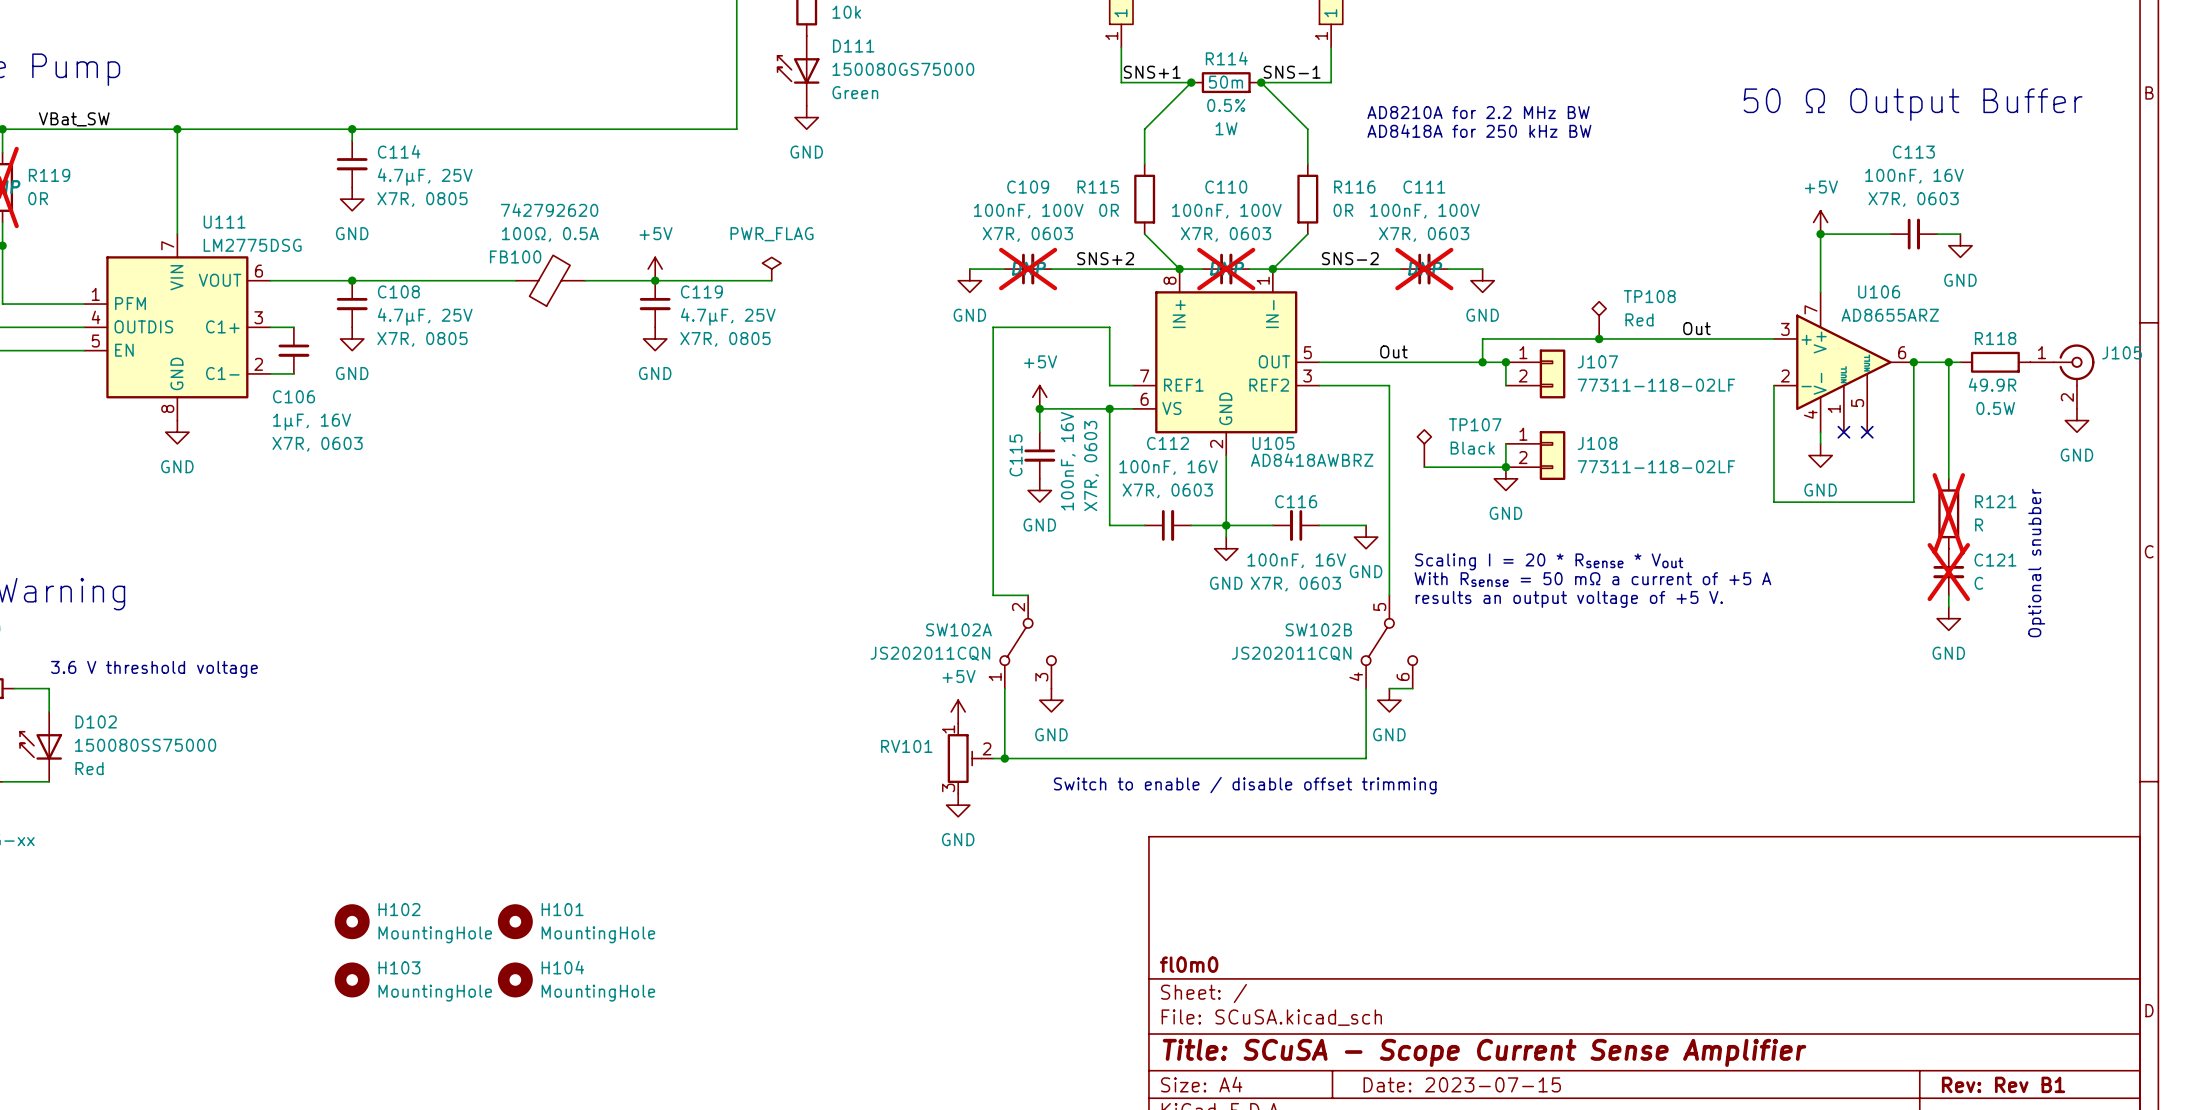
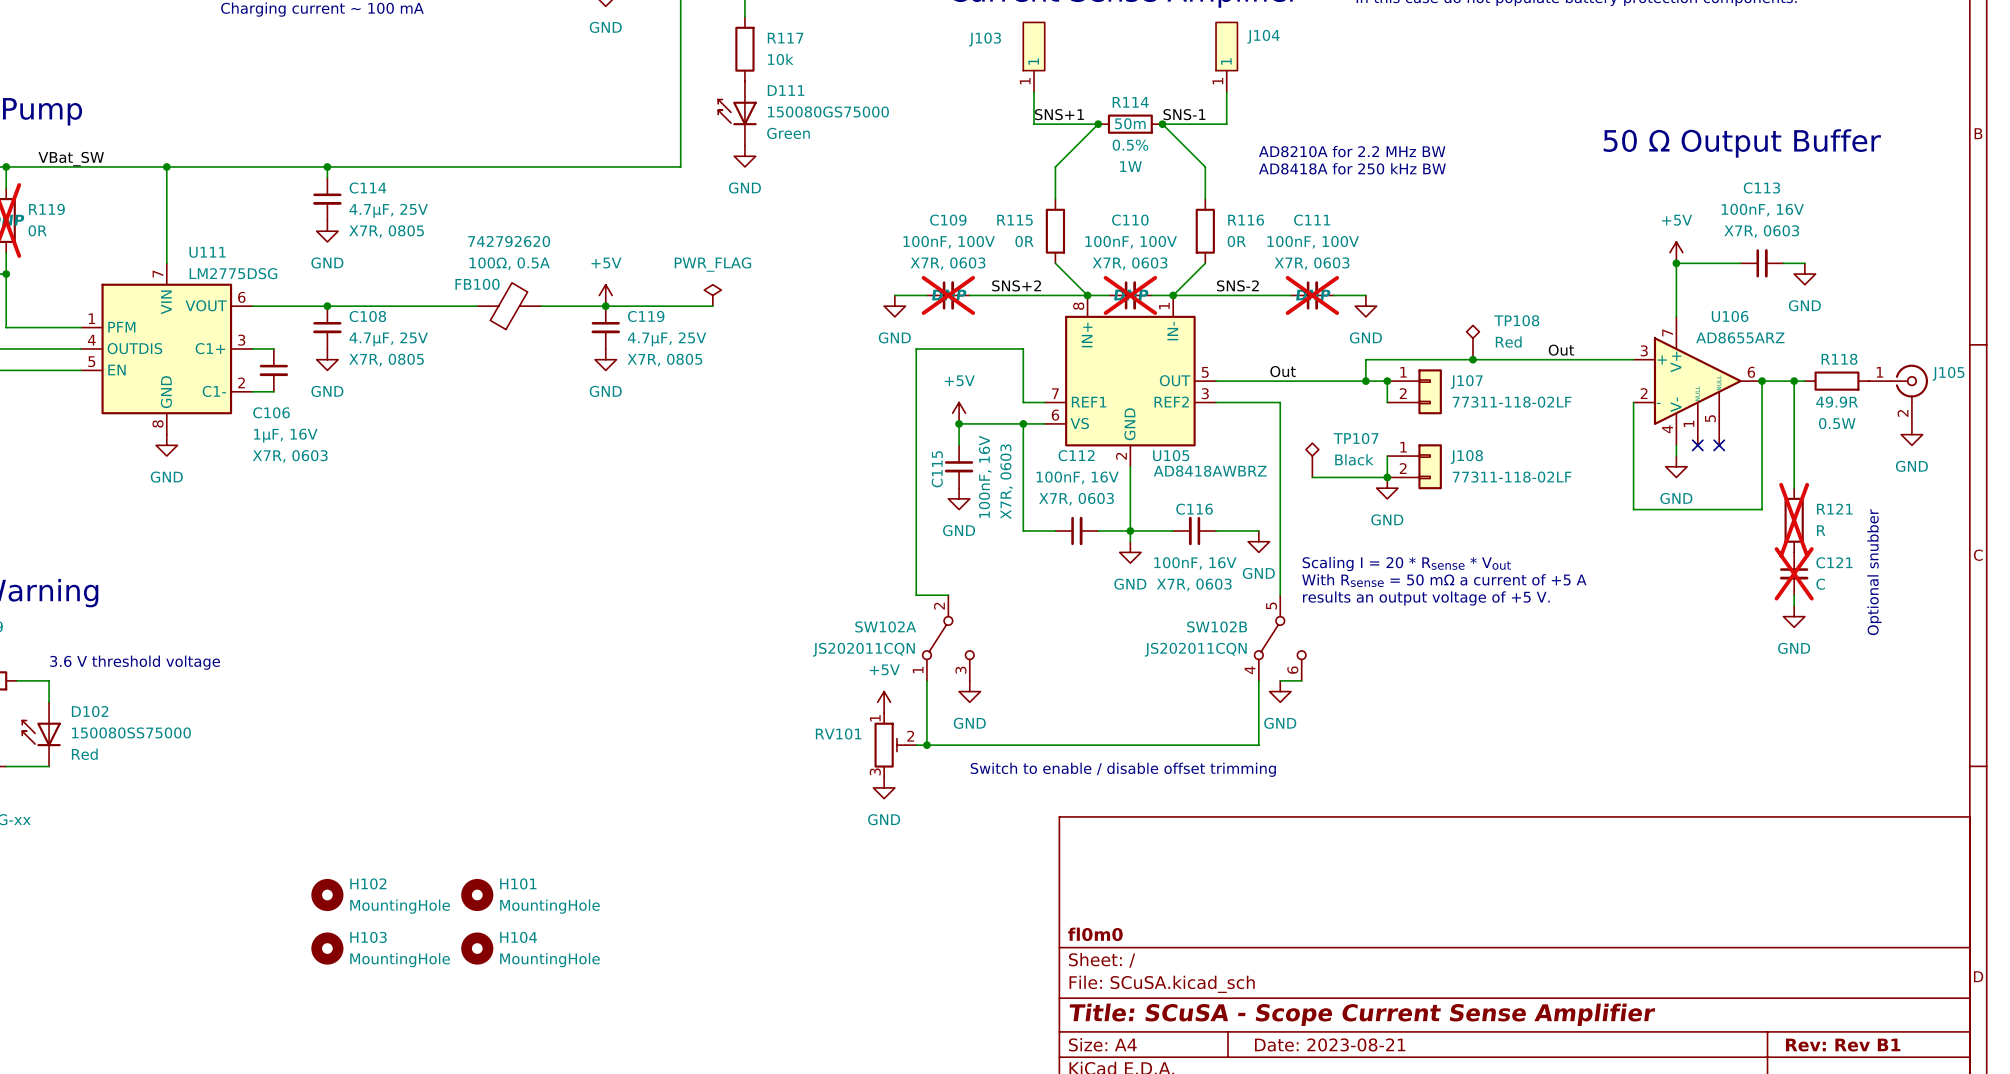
title block: Date: 2023-07-15 (1462, 1084) -> Date: 2023-08-21 (1330, 1044)

